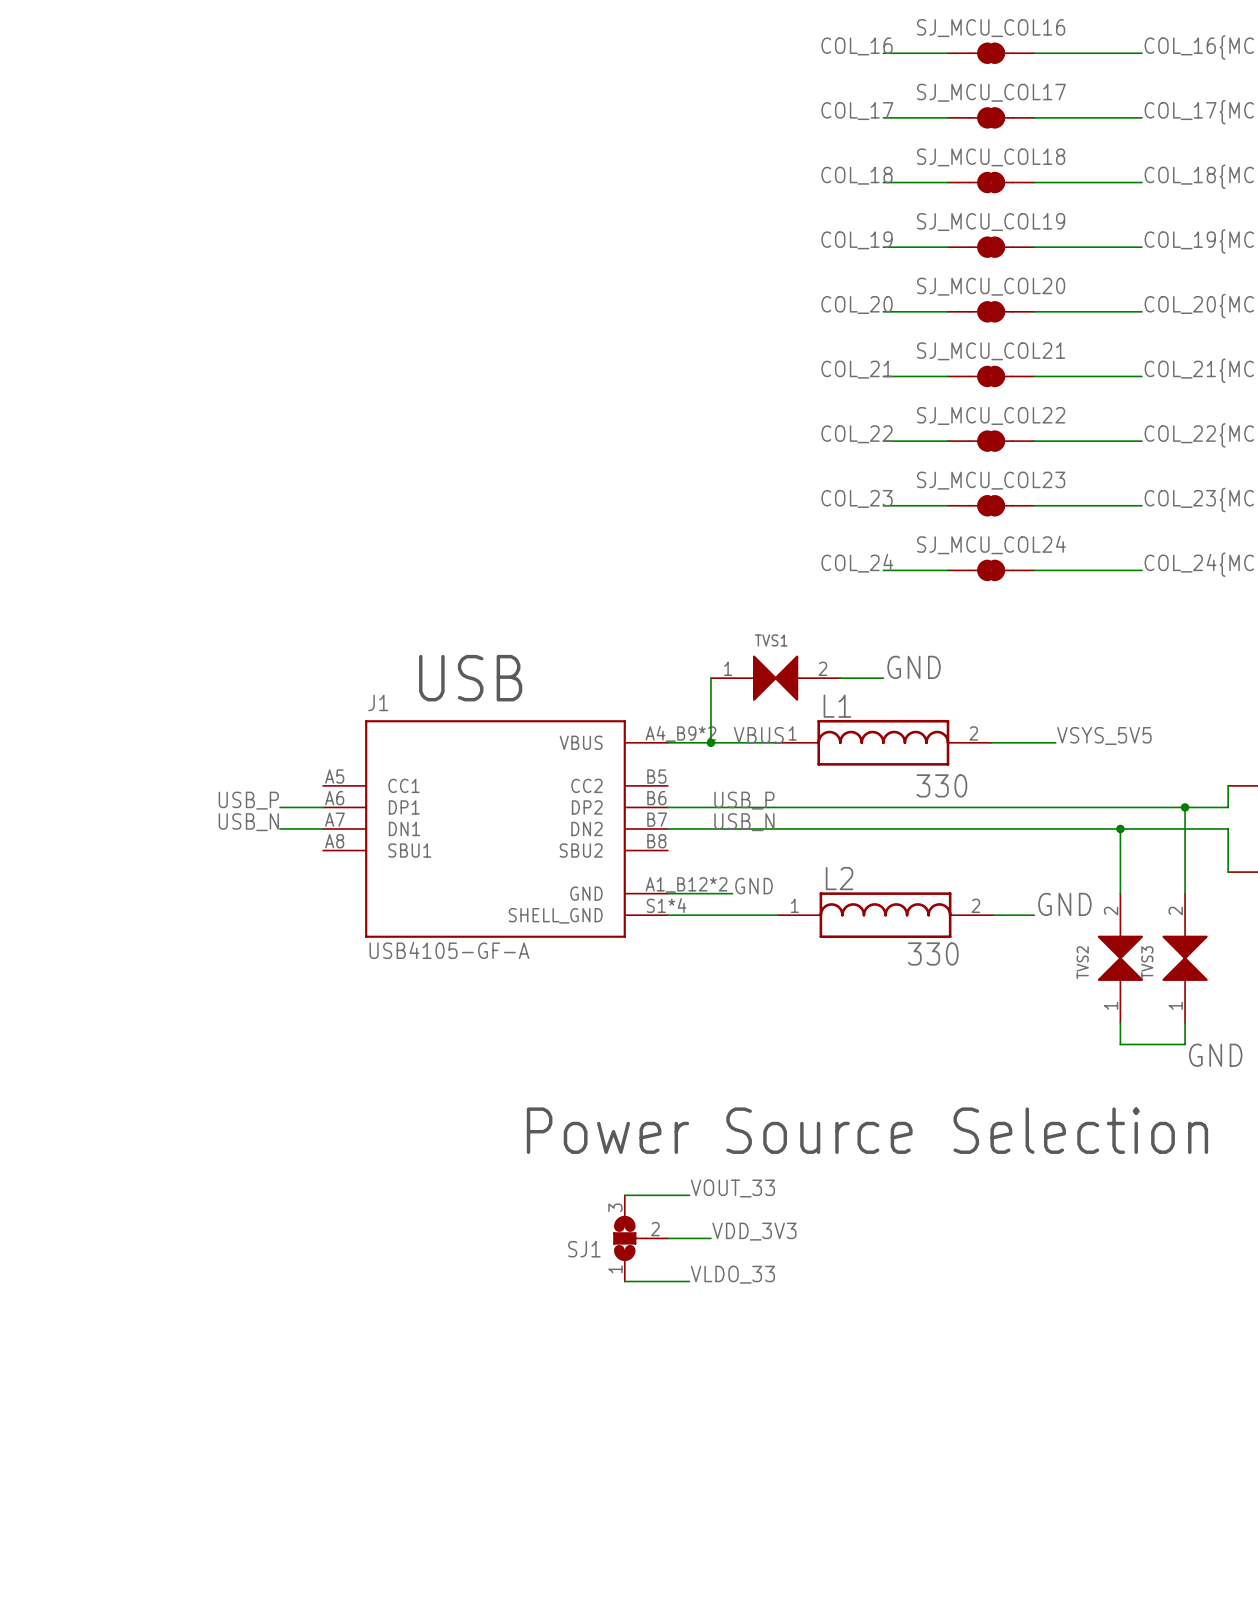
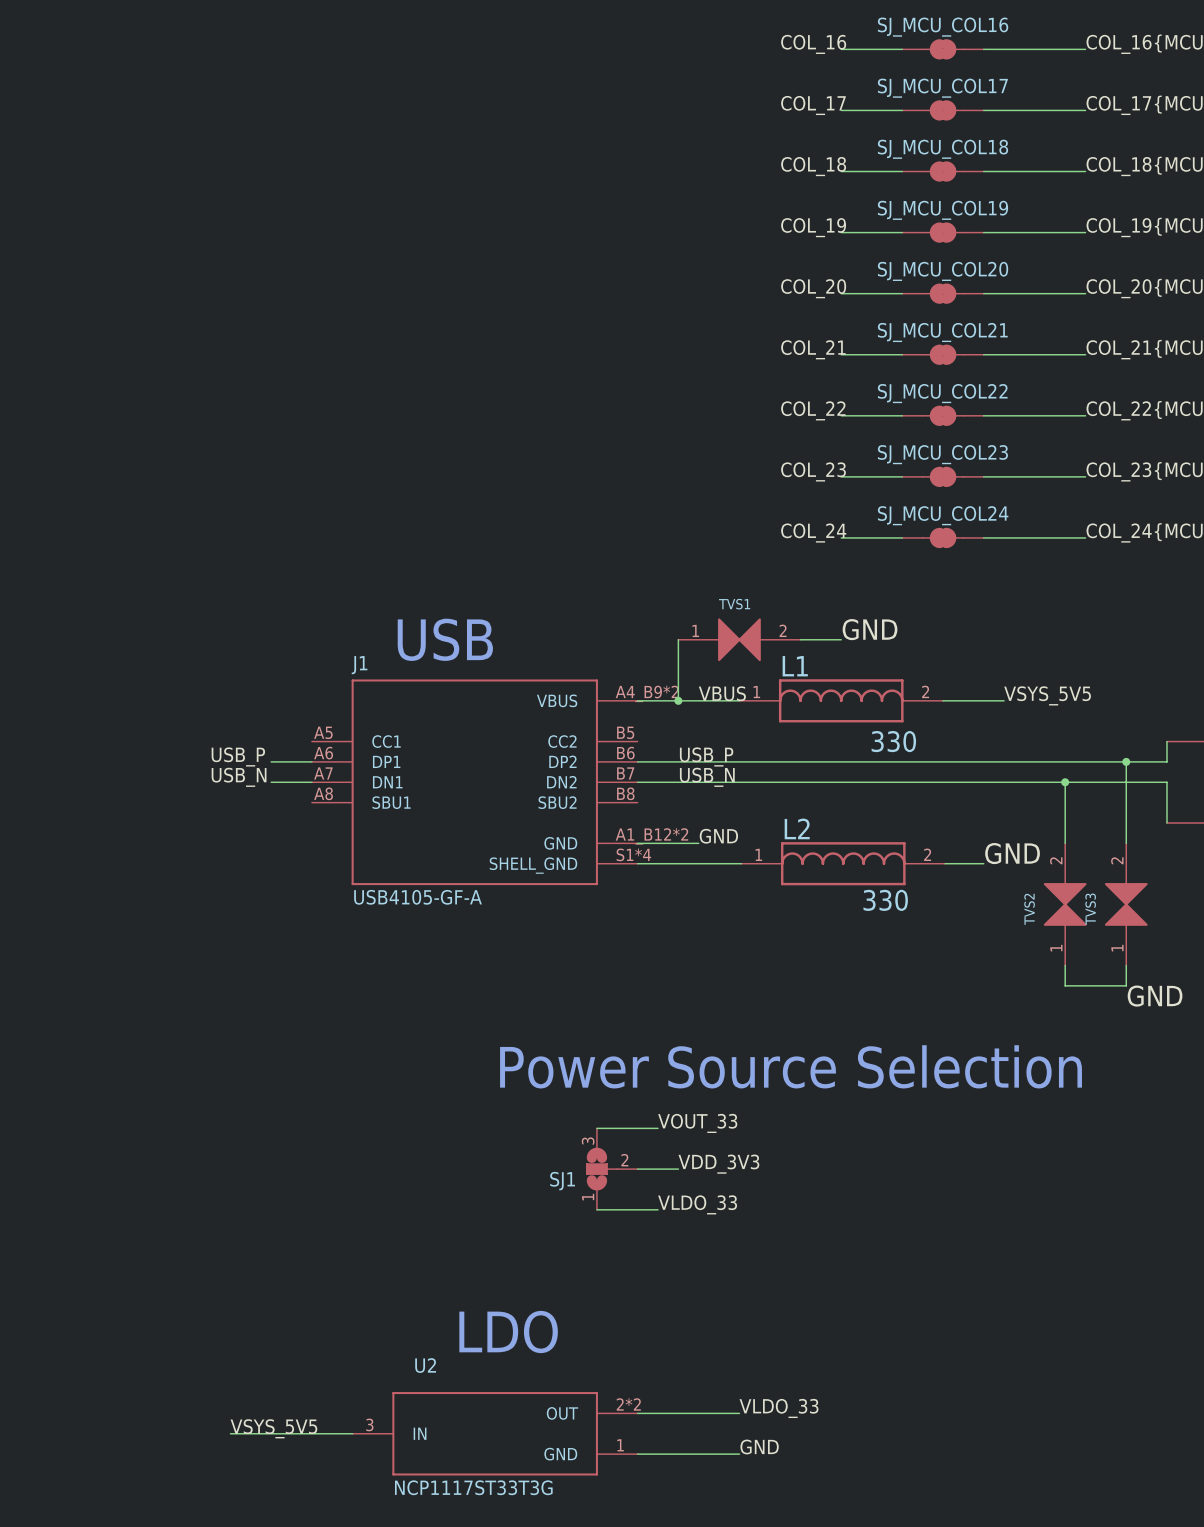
text: none -> LDO (508, 1331)
label: none -> VLDO_33 (779, 1408)
wire: none -> (637, 1413) (739, 1413)
label: none -> VSYS_5V5 (273, 1428)
wire: none -> (230, 1433) (352, 1433)
U2: none -> NCP1117ST33T3G (495, 1433)
label: none -> GND (759, 1447)
wire: none -> (637, 1454) (739, 1454)

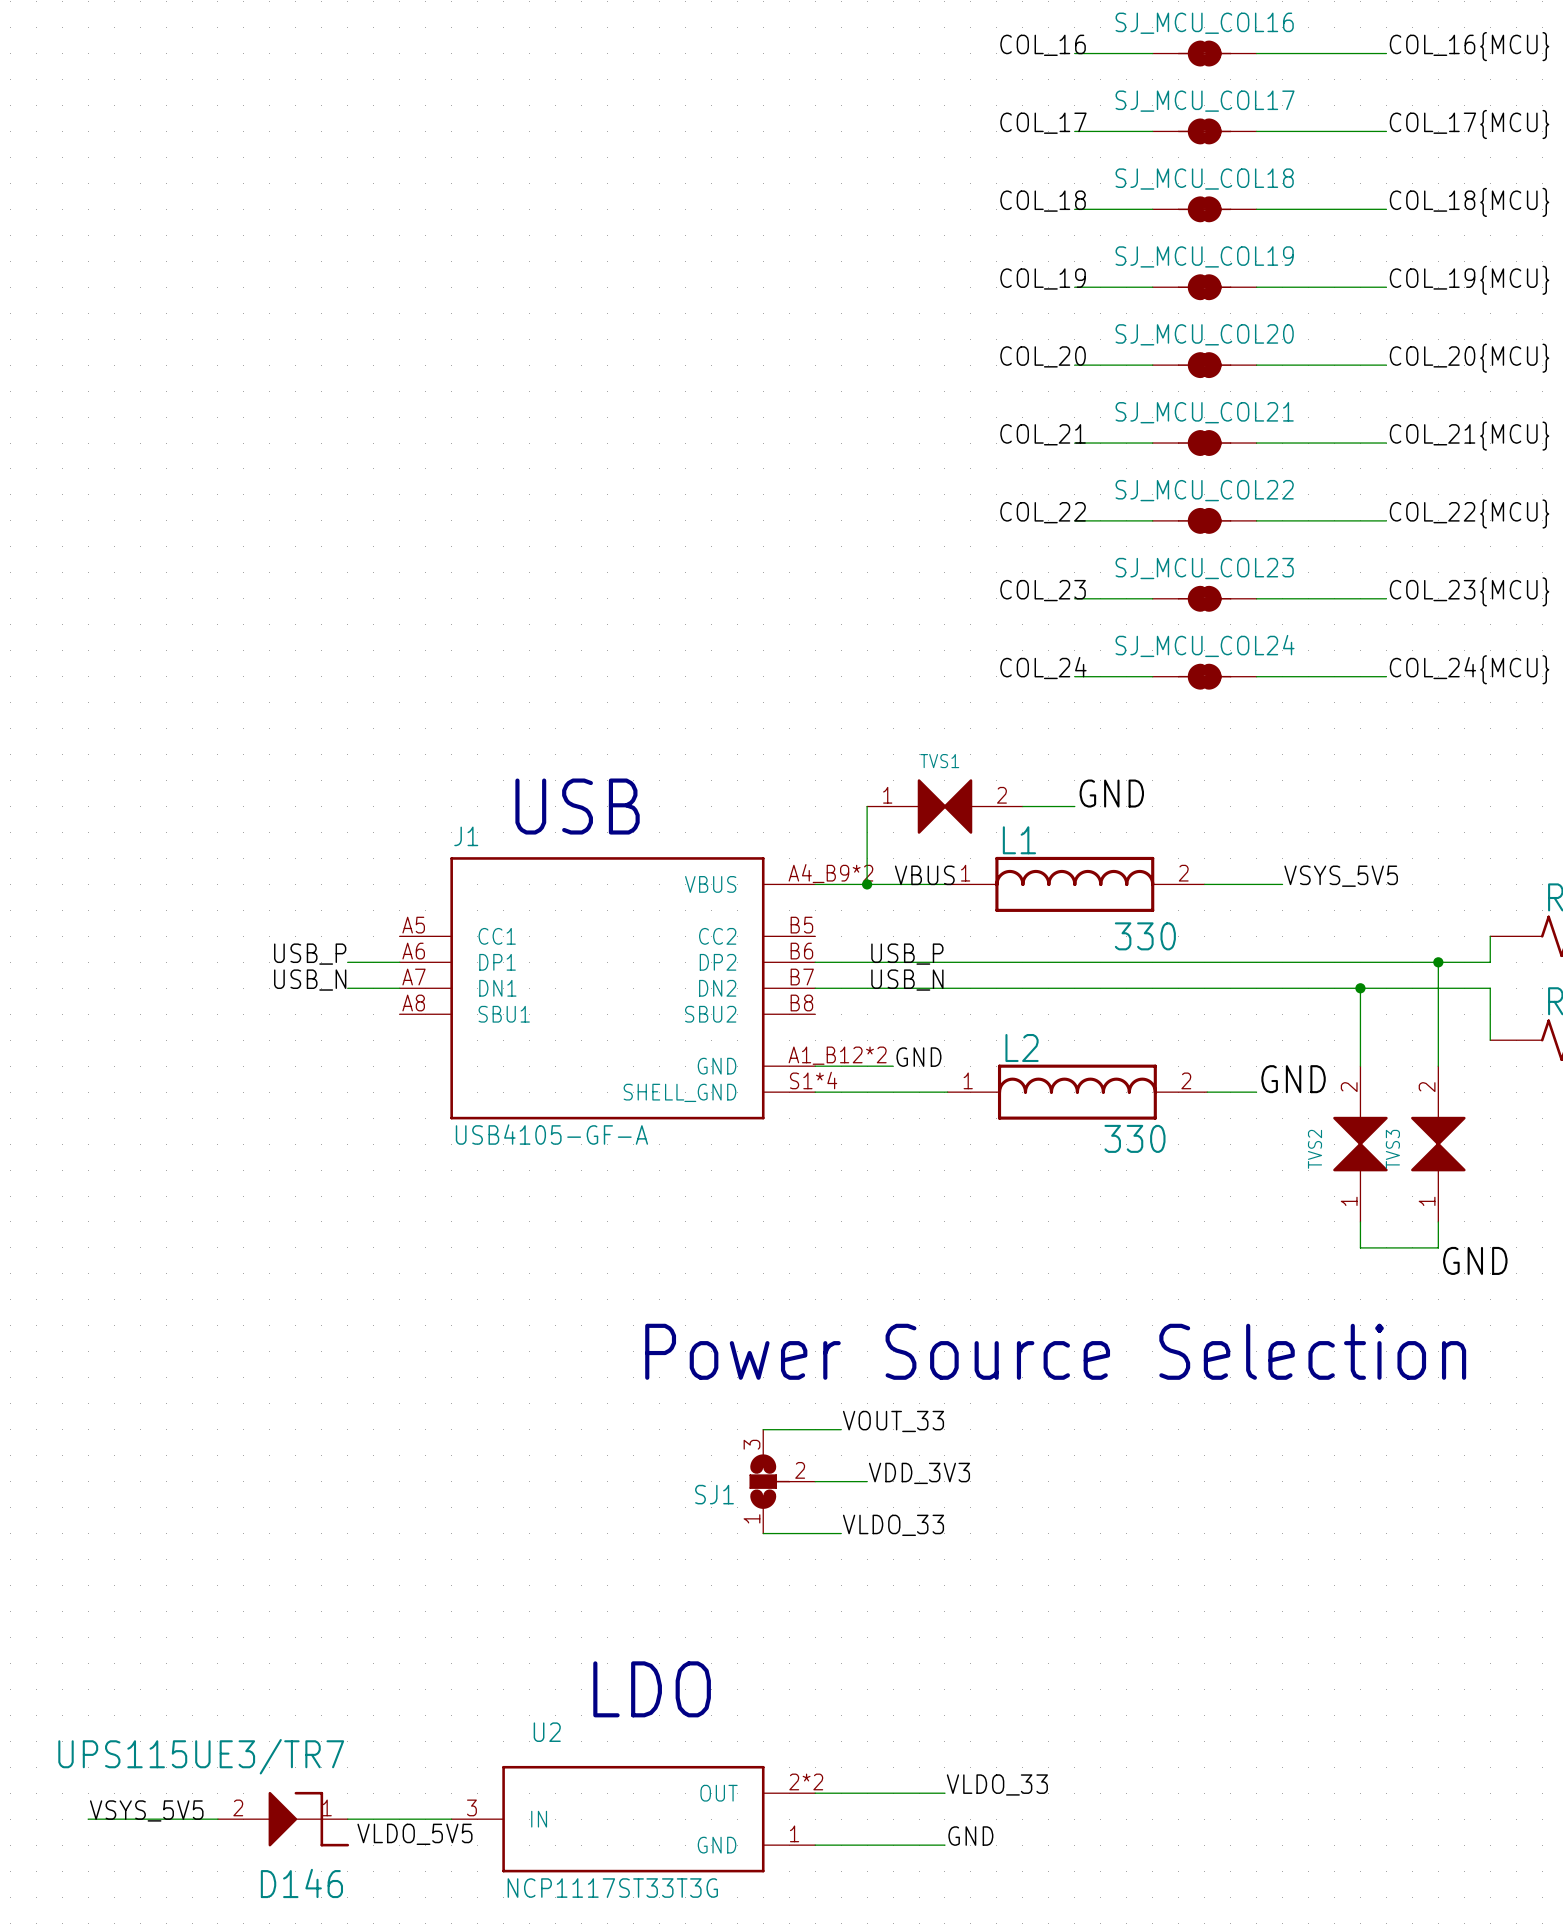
label position: VSYS_5V5 (273, 1428) -> VSYS_5V5 (146, 1810)
wire: none -> (88, 1819) (217, 1819)
D146: none -> UPS115UE3/TR7 (283, 1819)
label: none -> VLDO_5V5 (414, 1834)

